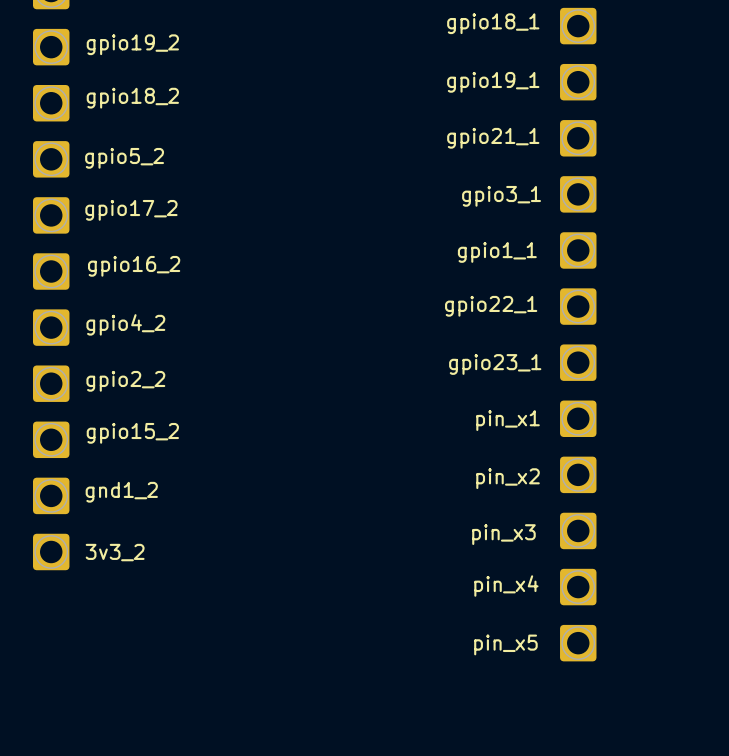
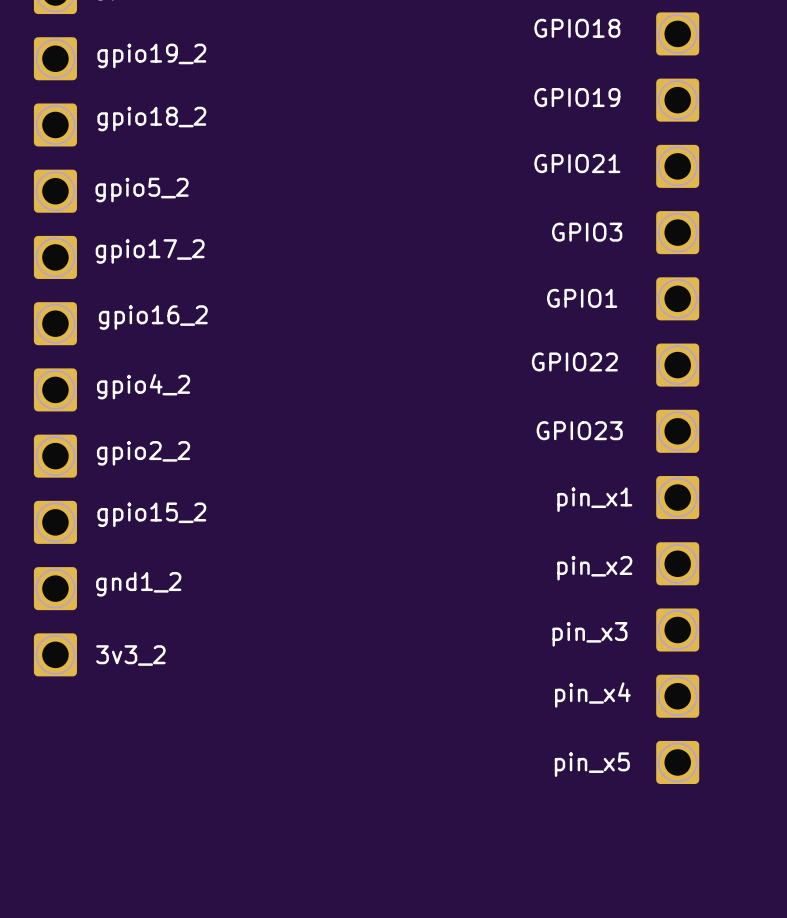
gpio18_1 name: gpio18_1 (493, 23) -> GPIO18 (577, 28)
gpio19_1 name: gpio19_1 (493, 82) -> GPIO19 (577, 97)
gpio21_1 name: gpio21_1 (493, 138) -> GPIO21 (577, 163)
gpio3_1 name: gpio3_1 (501, 196) -> GPIO3 (587, 232)
gpio1_1 name: gpio1_1 (497, 252) -> GPIO1 (582, 298)
gpio22_1 name: gpio22_1 (491, 306) -> GPIO22 (574, 361)
gpio23_1 name: gpio23_1 (495, 364) -> GPIO23 (579, 430)

